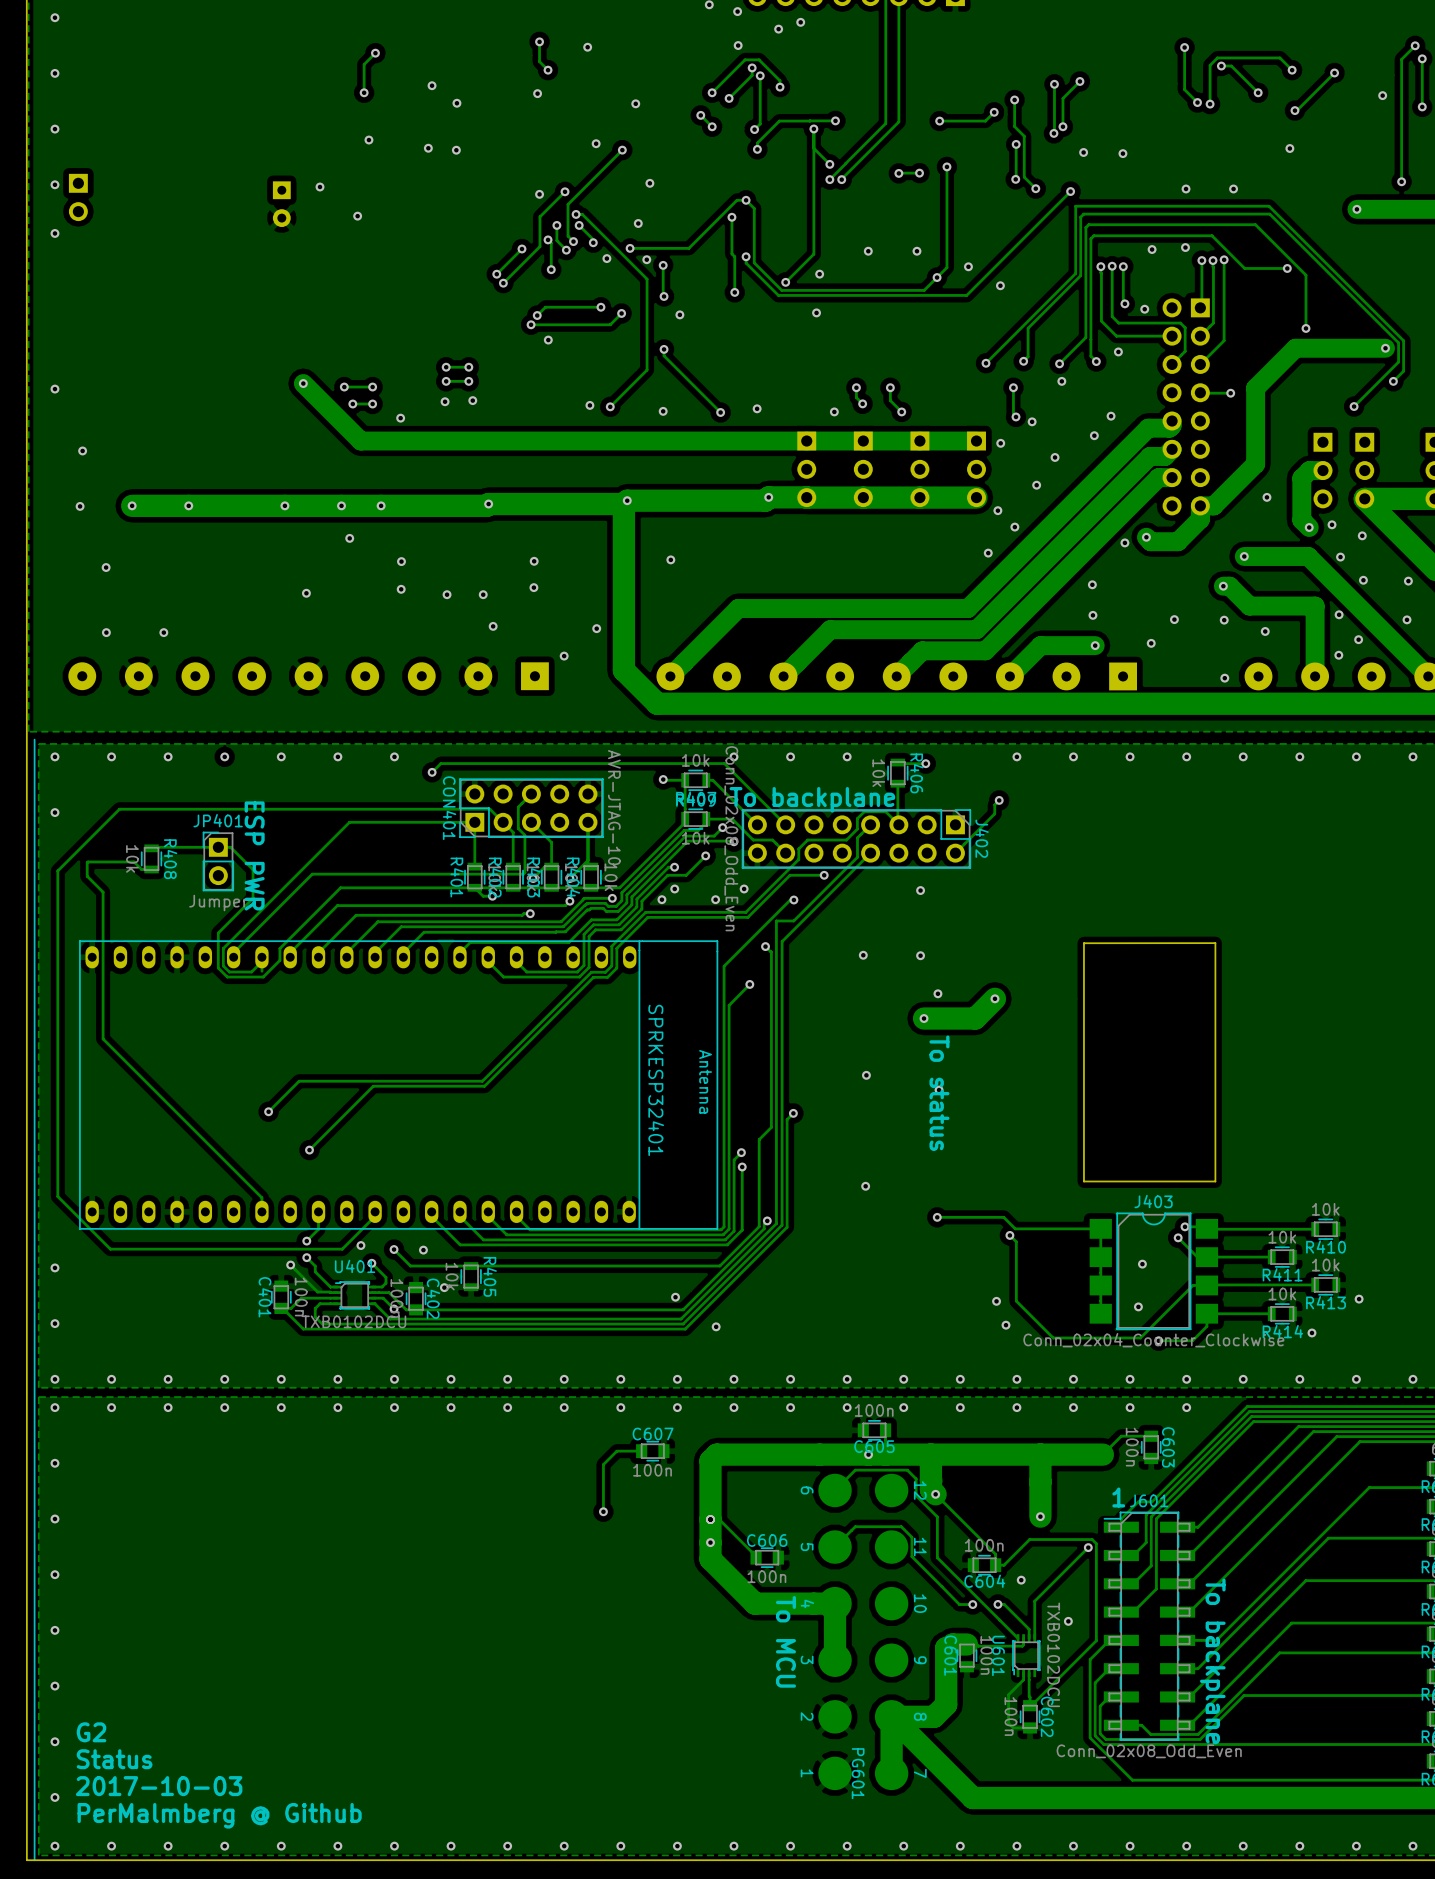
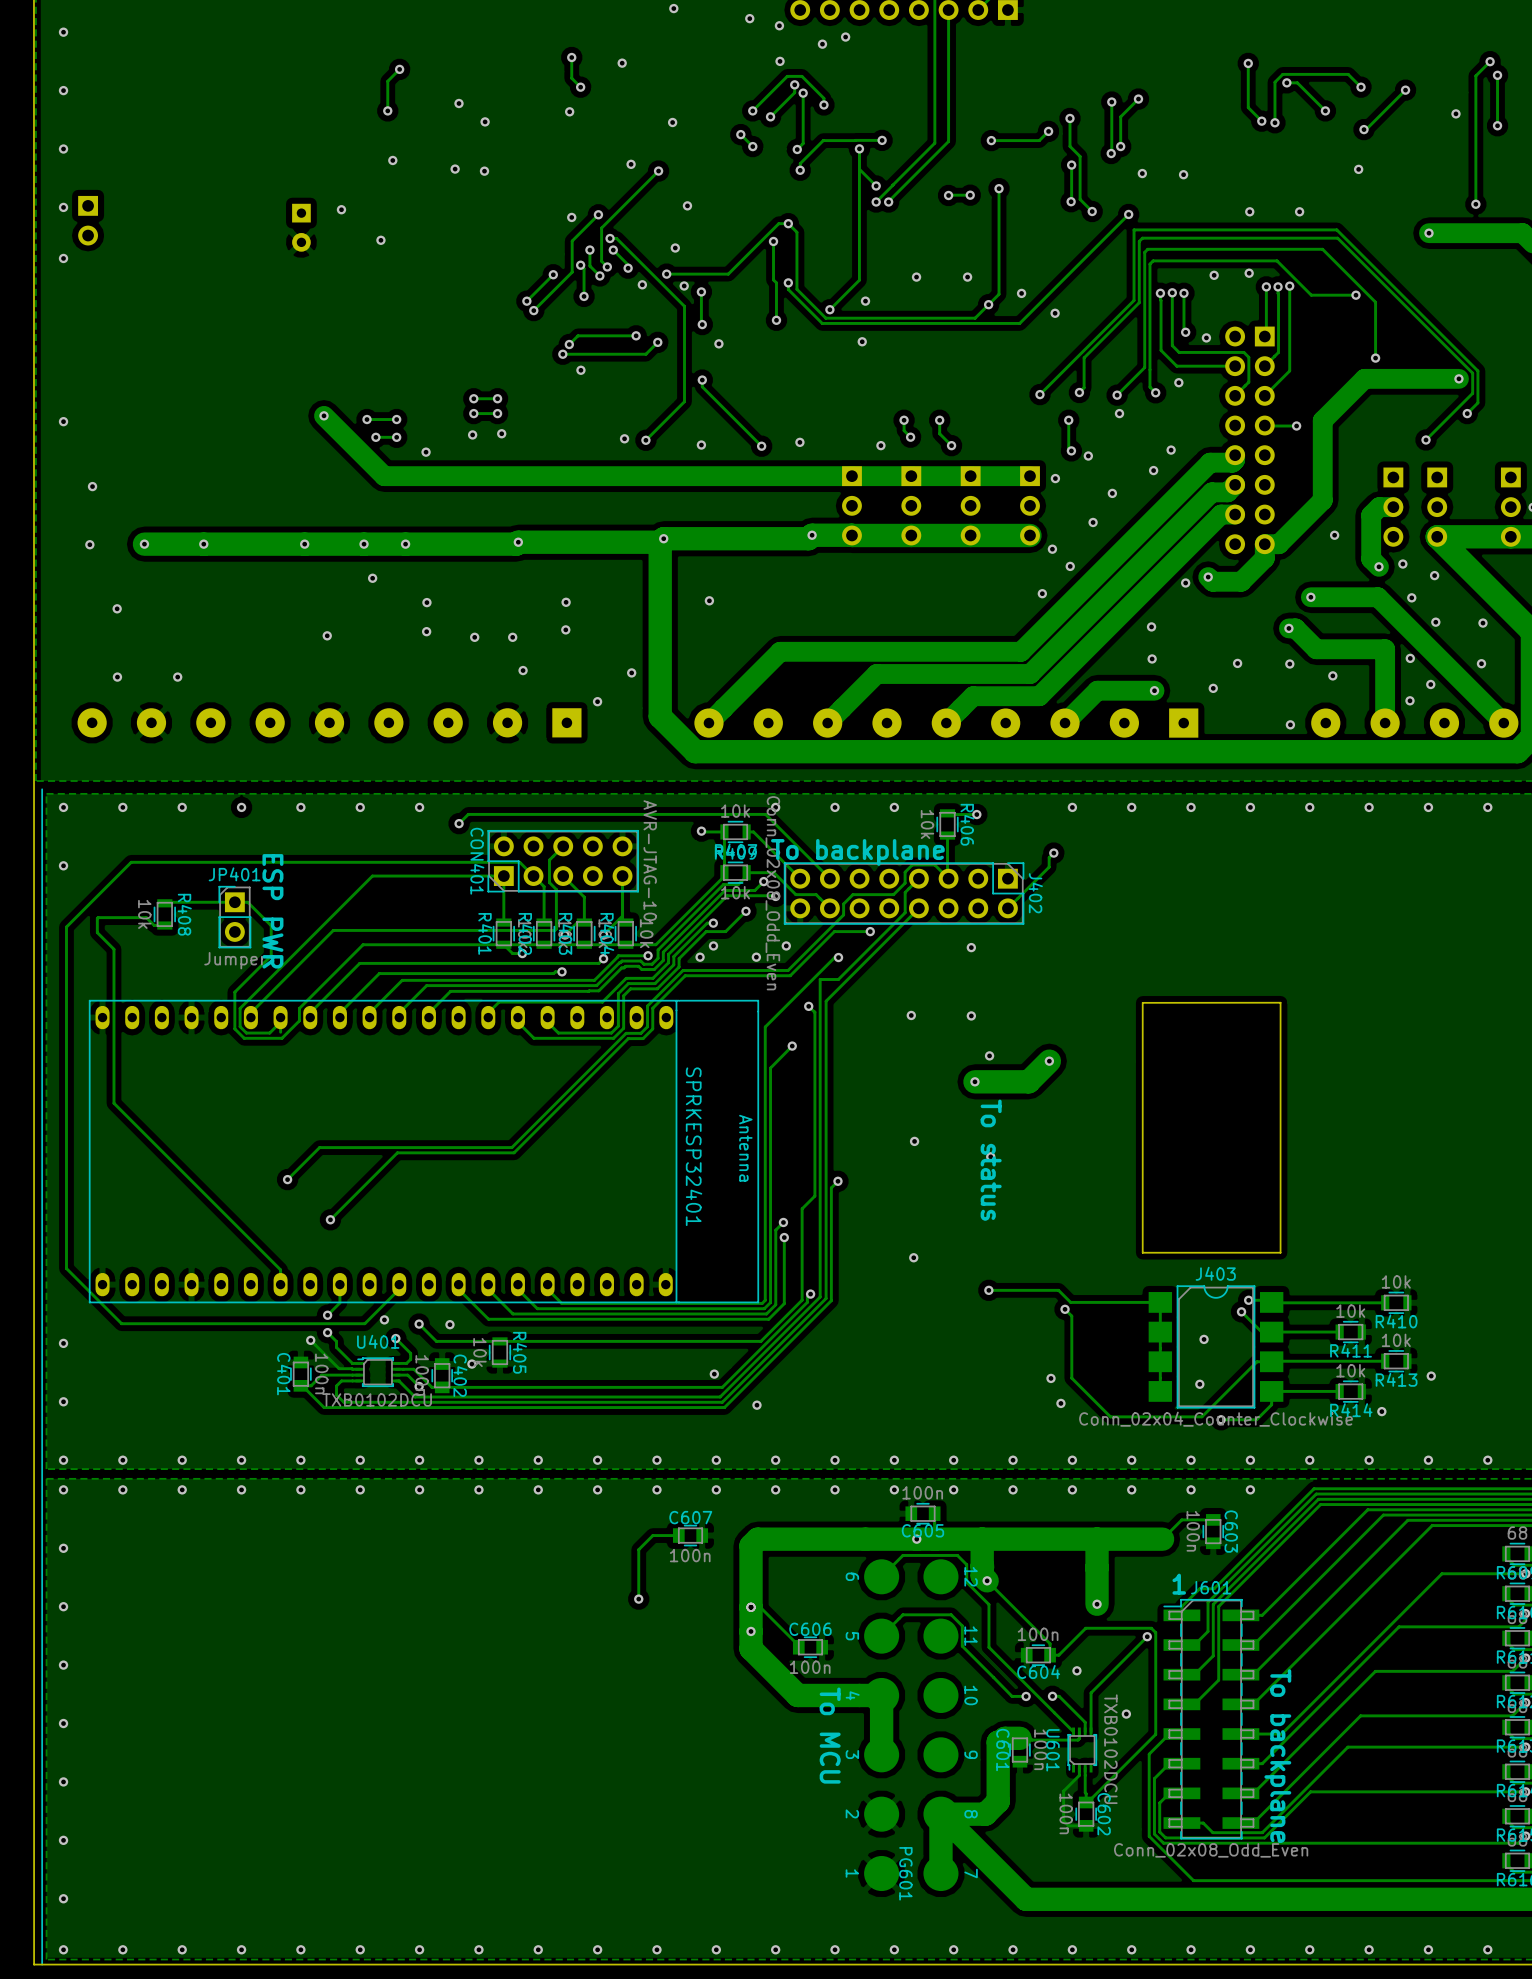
text: G2 (91, 1732) -> none
text: Status (114, 1759) -> none
text: 2017-10-03 (159, 1786) -> none
text: PerMalmberg @ Github (219, 1815) -> none

